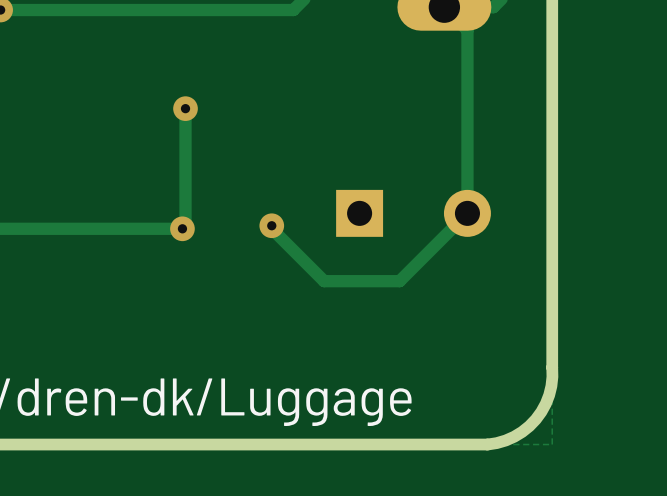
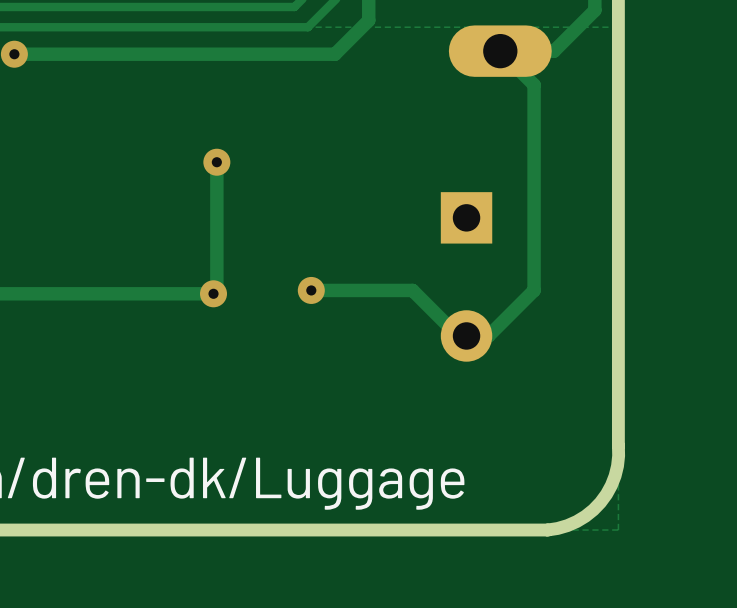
track: (467, 30) (467, 213) (399, 281) (324, 281) (271, 228) (271, 225) -> (525, 76) (534, 84) (534, 290) (488, 335) (458, 335) (412, 290) (311, 290)
part rotation: 0° (413, 213) -> 90° clockwise (466, 276)

